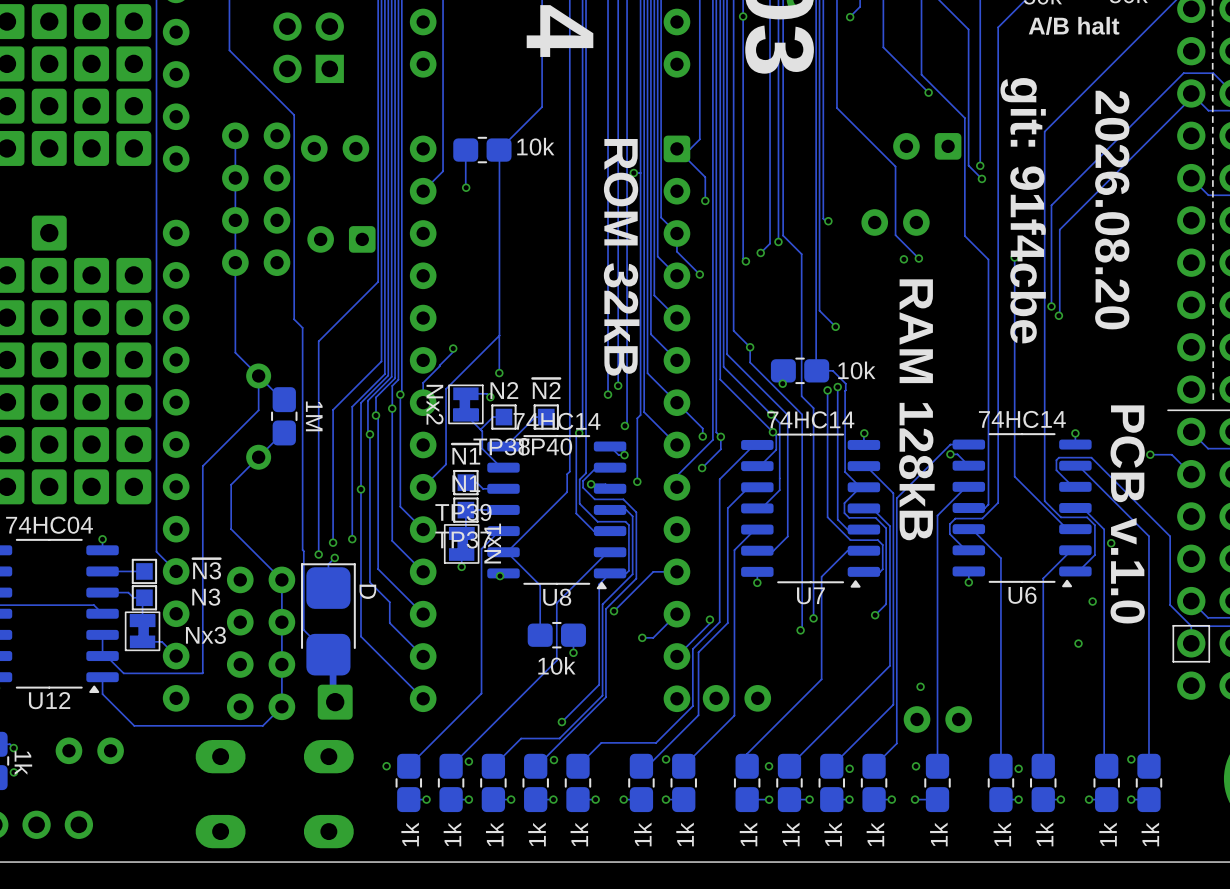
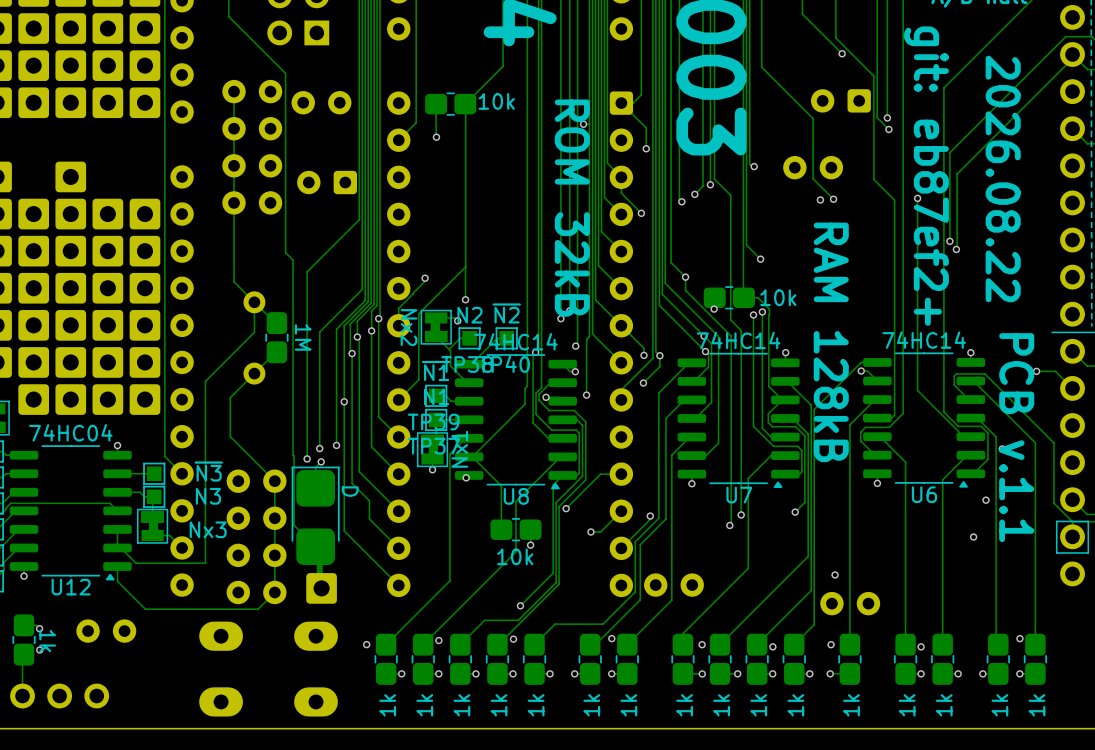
text: none -> git: eb87ef2+ (926, 176)
text: git: 91f4cbe (1023, 210) -> none
text: 2026.08.20 (1112, 210) -> 2026.08.22 (1003, 178)
text: PCB v.1.0 (1127, 514) -> PCB v.1.1 (1016, 437)

